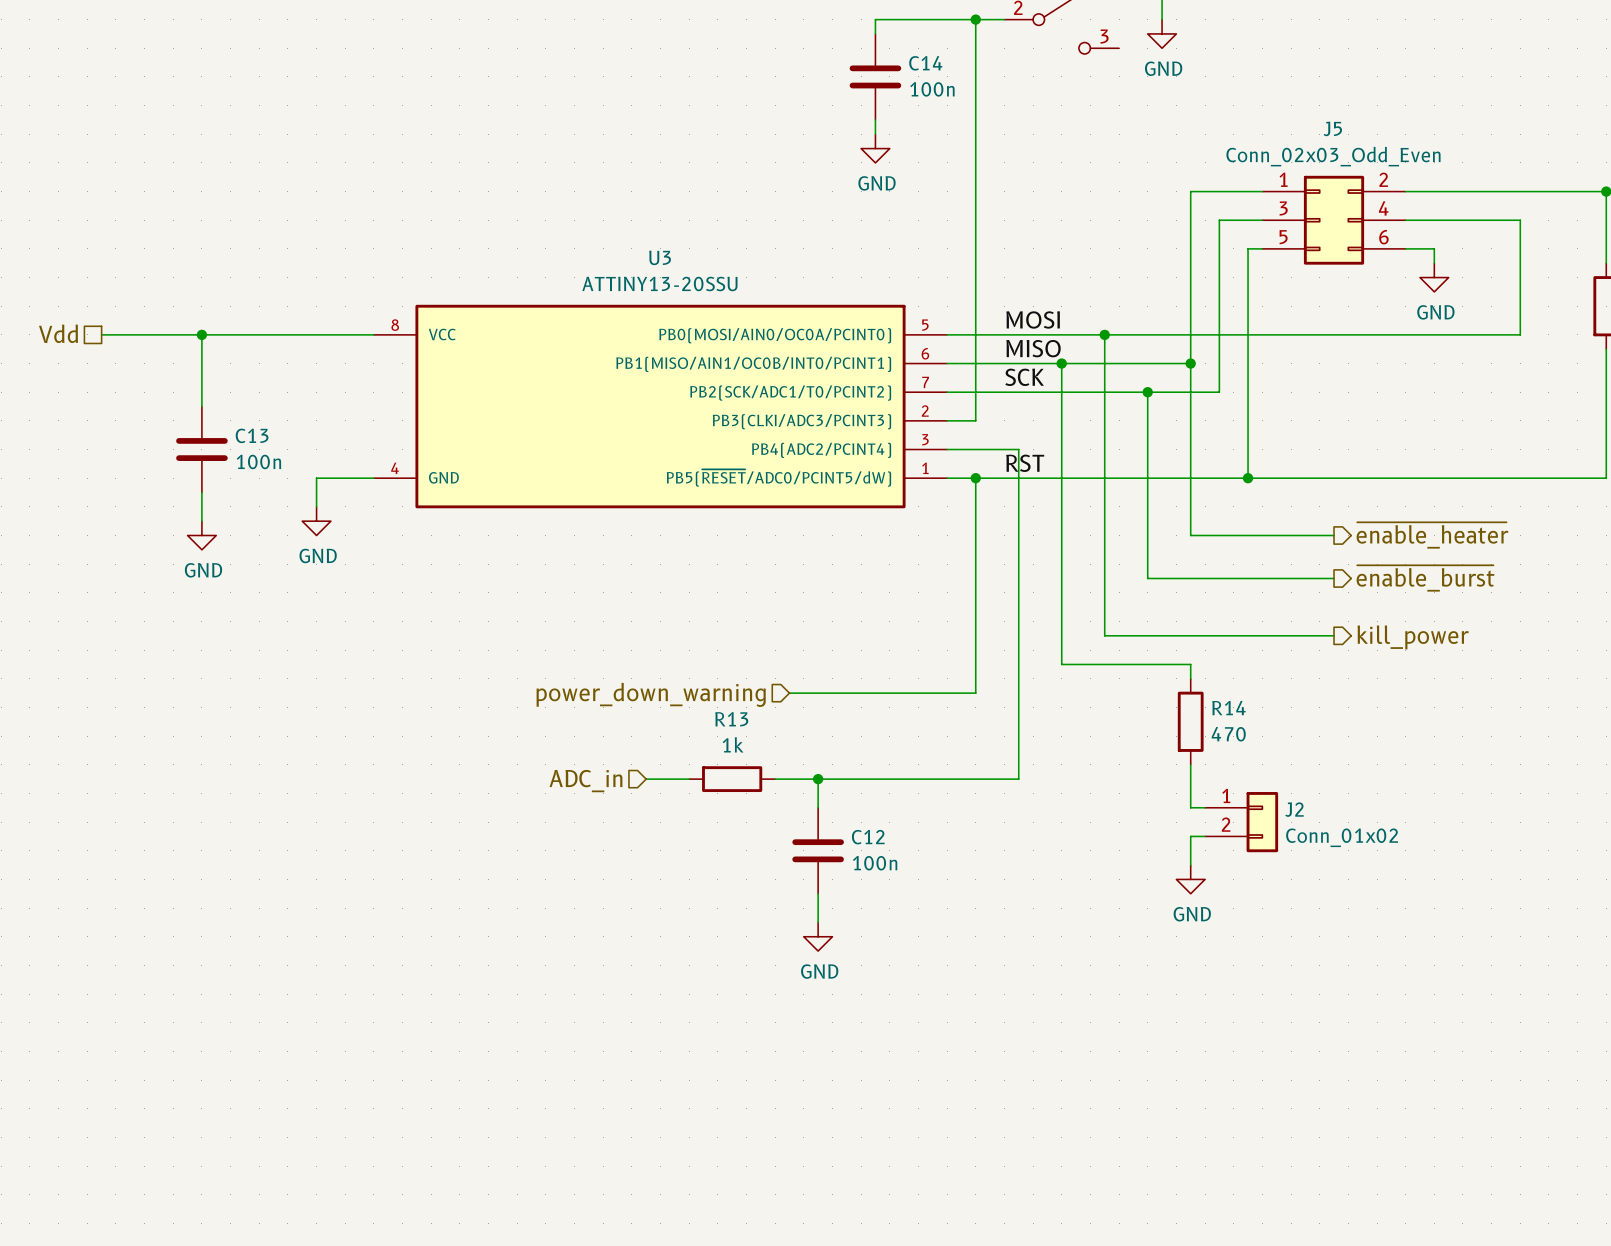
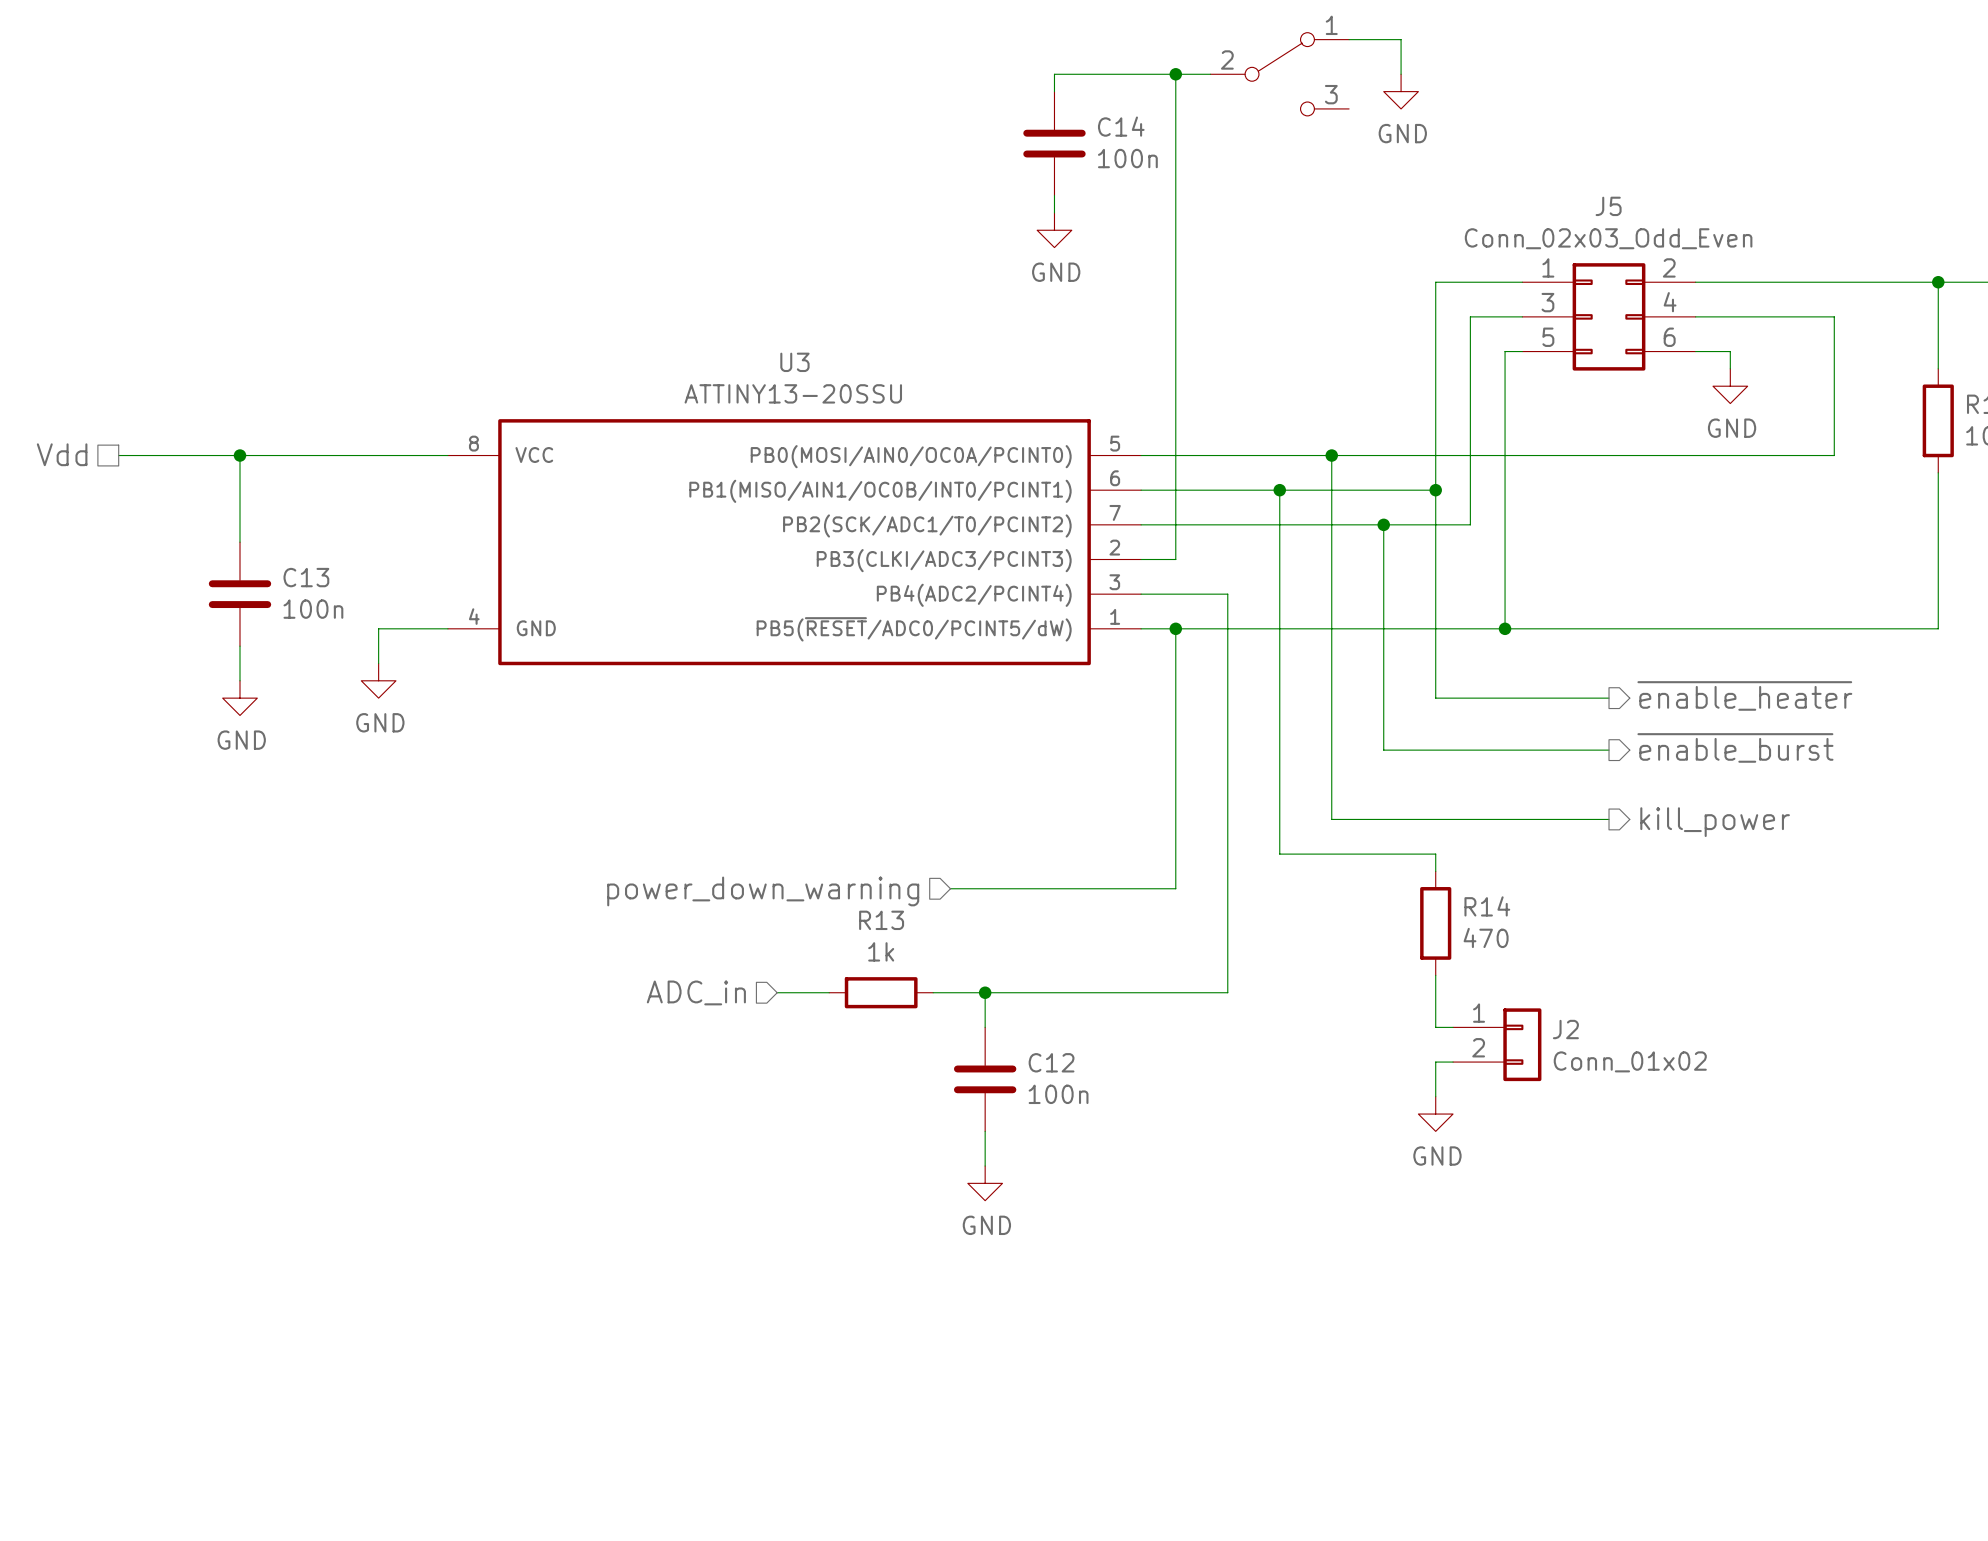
label: MOSI (1033, 319) -> none
label: MISO (1033, 348) -> none
label: SCK (1024, 377) -> none
label: RST (1025, 463) -> none

